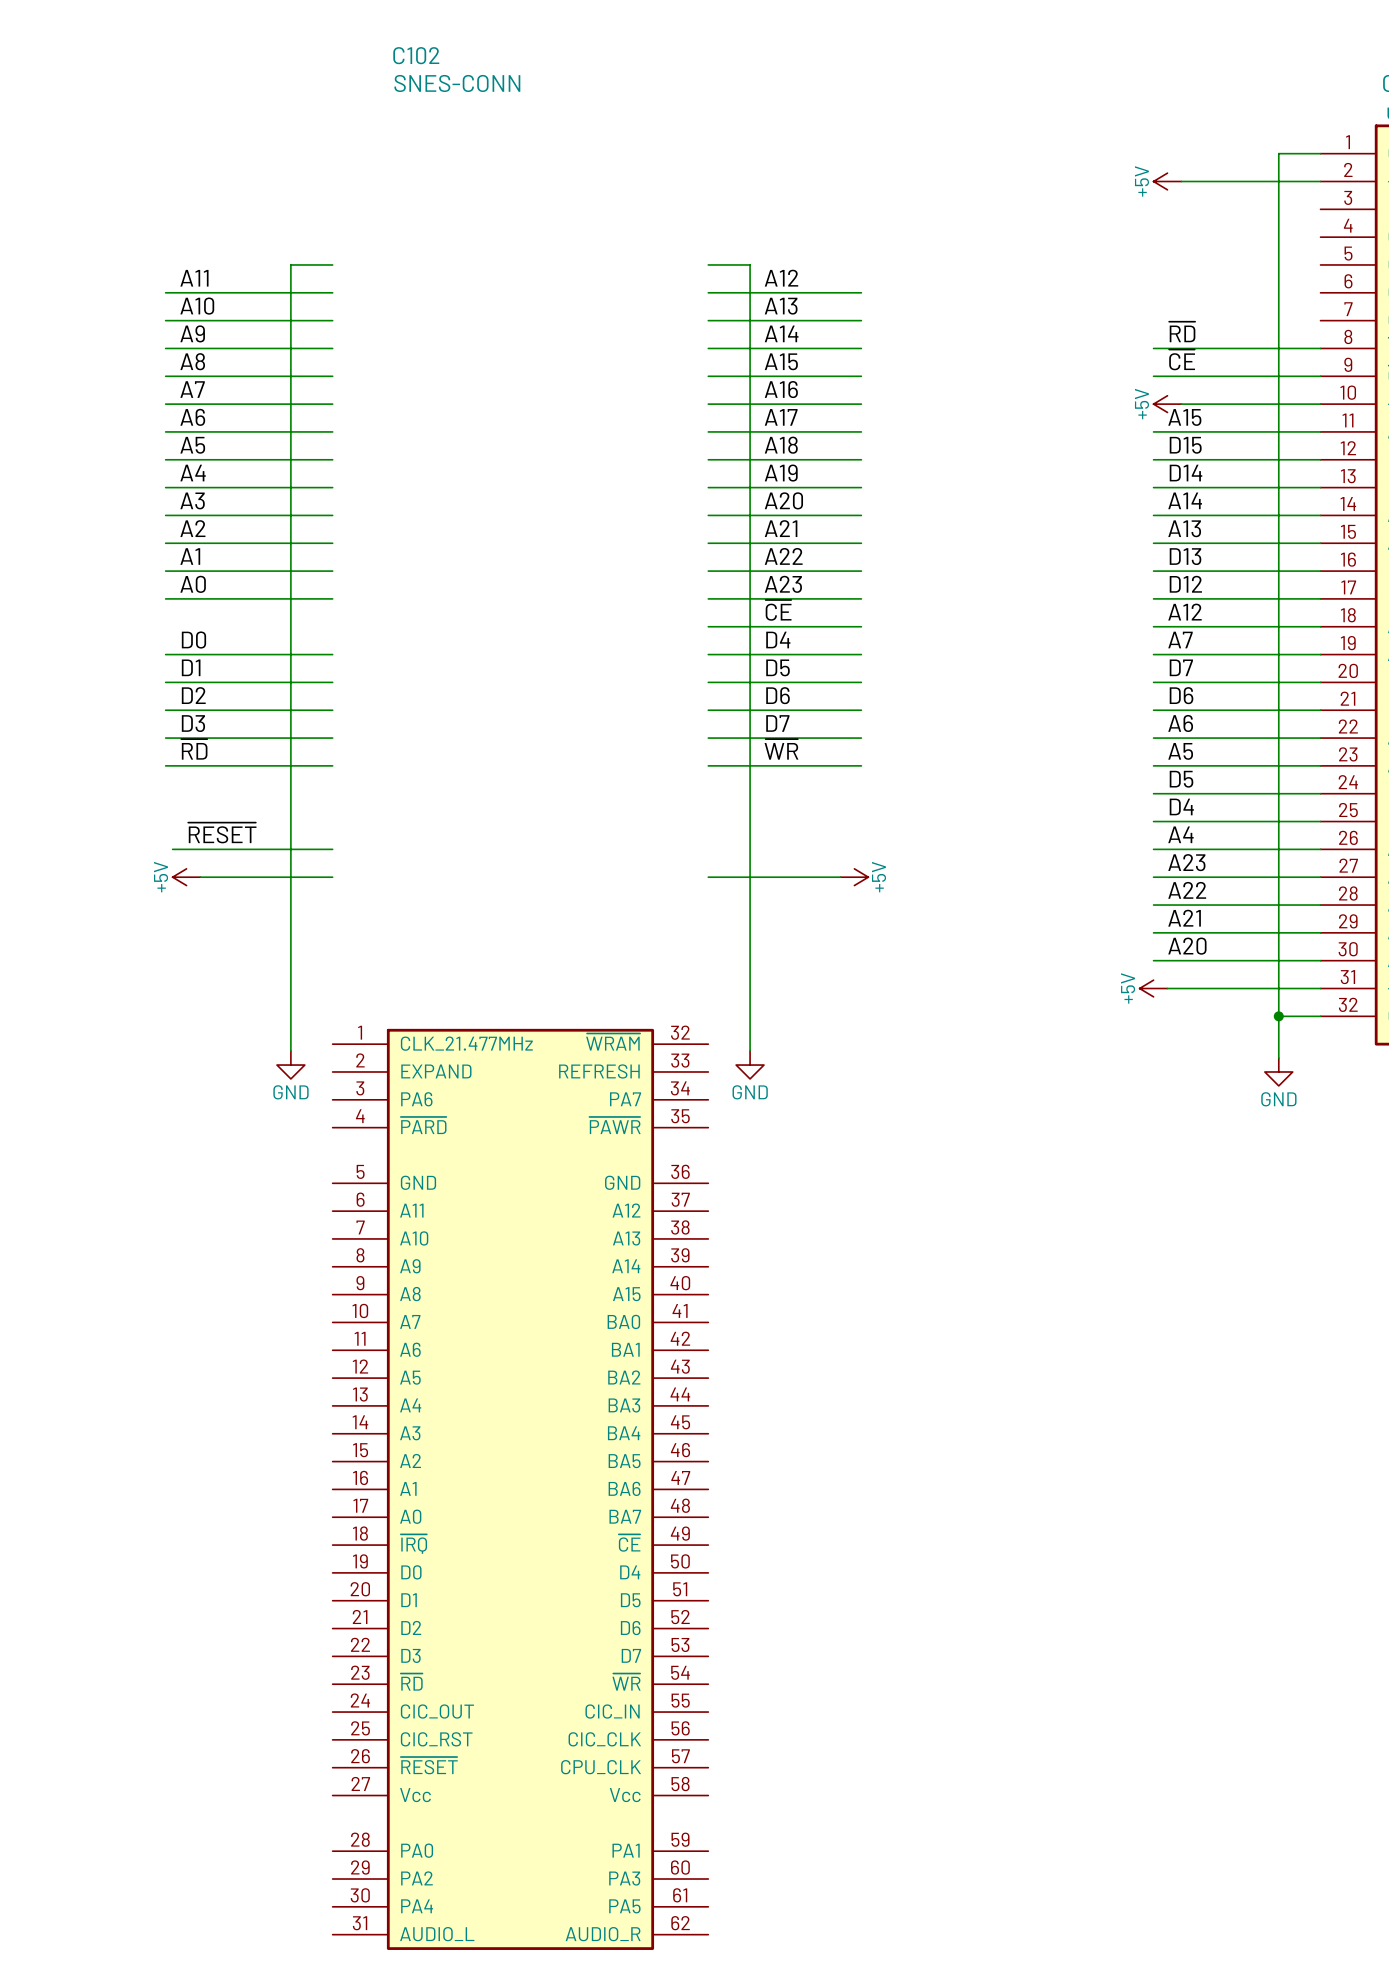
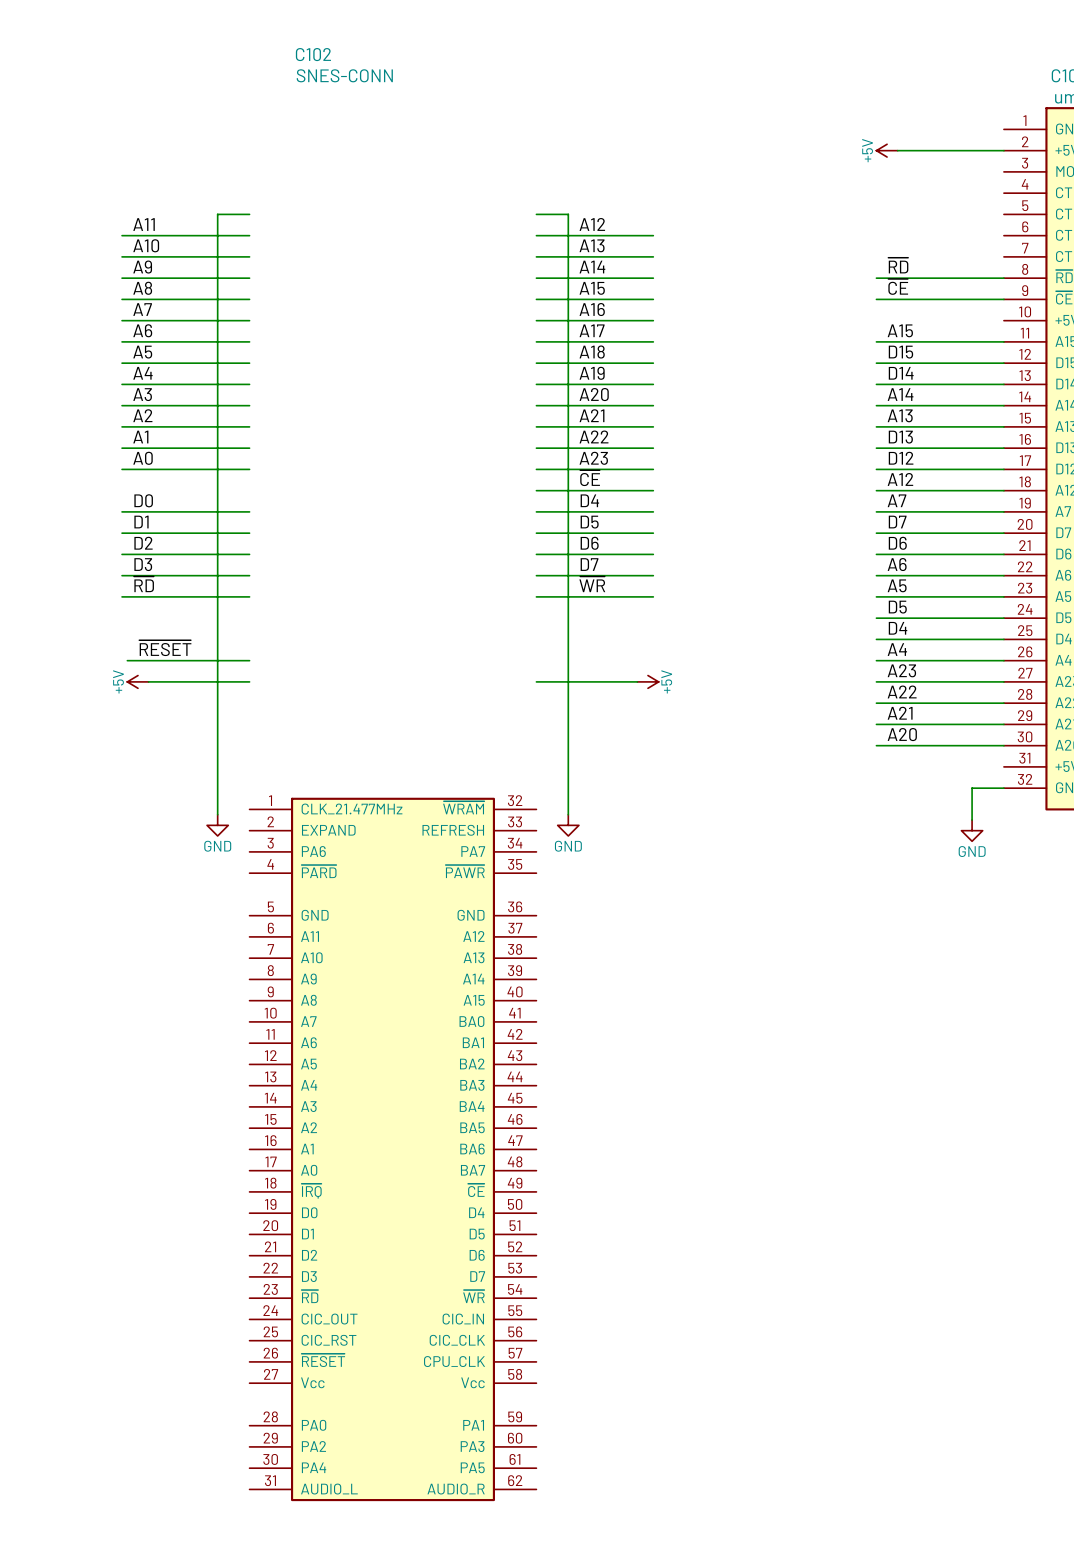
wire: (1320, 153) (1278, 153) (1278, 1016) -> none
power symbol: +5V (1167, 404) -> none
wire: (1181, 404) (1320, 404) -> none
power symbol: +5V (1153, 988) -> none
wire: (1167, 988) (1320, 988) -> none
junction: (1278, 1016) -> none

